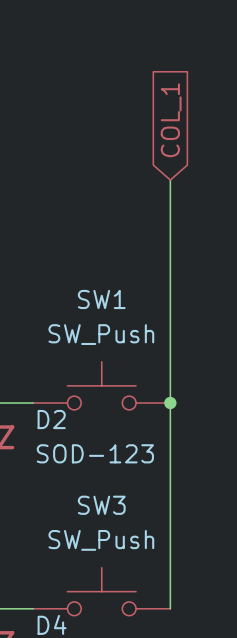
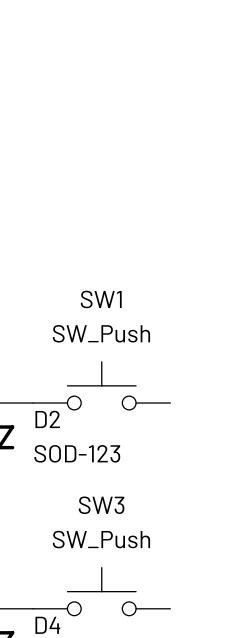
global label: COL_1 (171, 120) -> none
wire: (170, 180) (170, 608) -> none
junction: (170, 403) -> none

